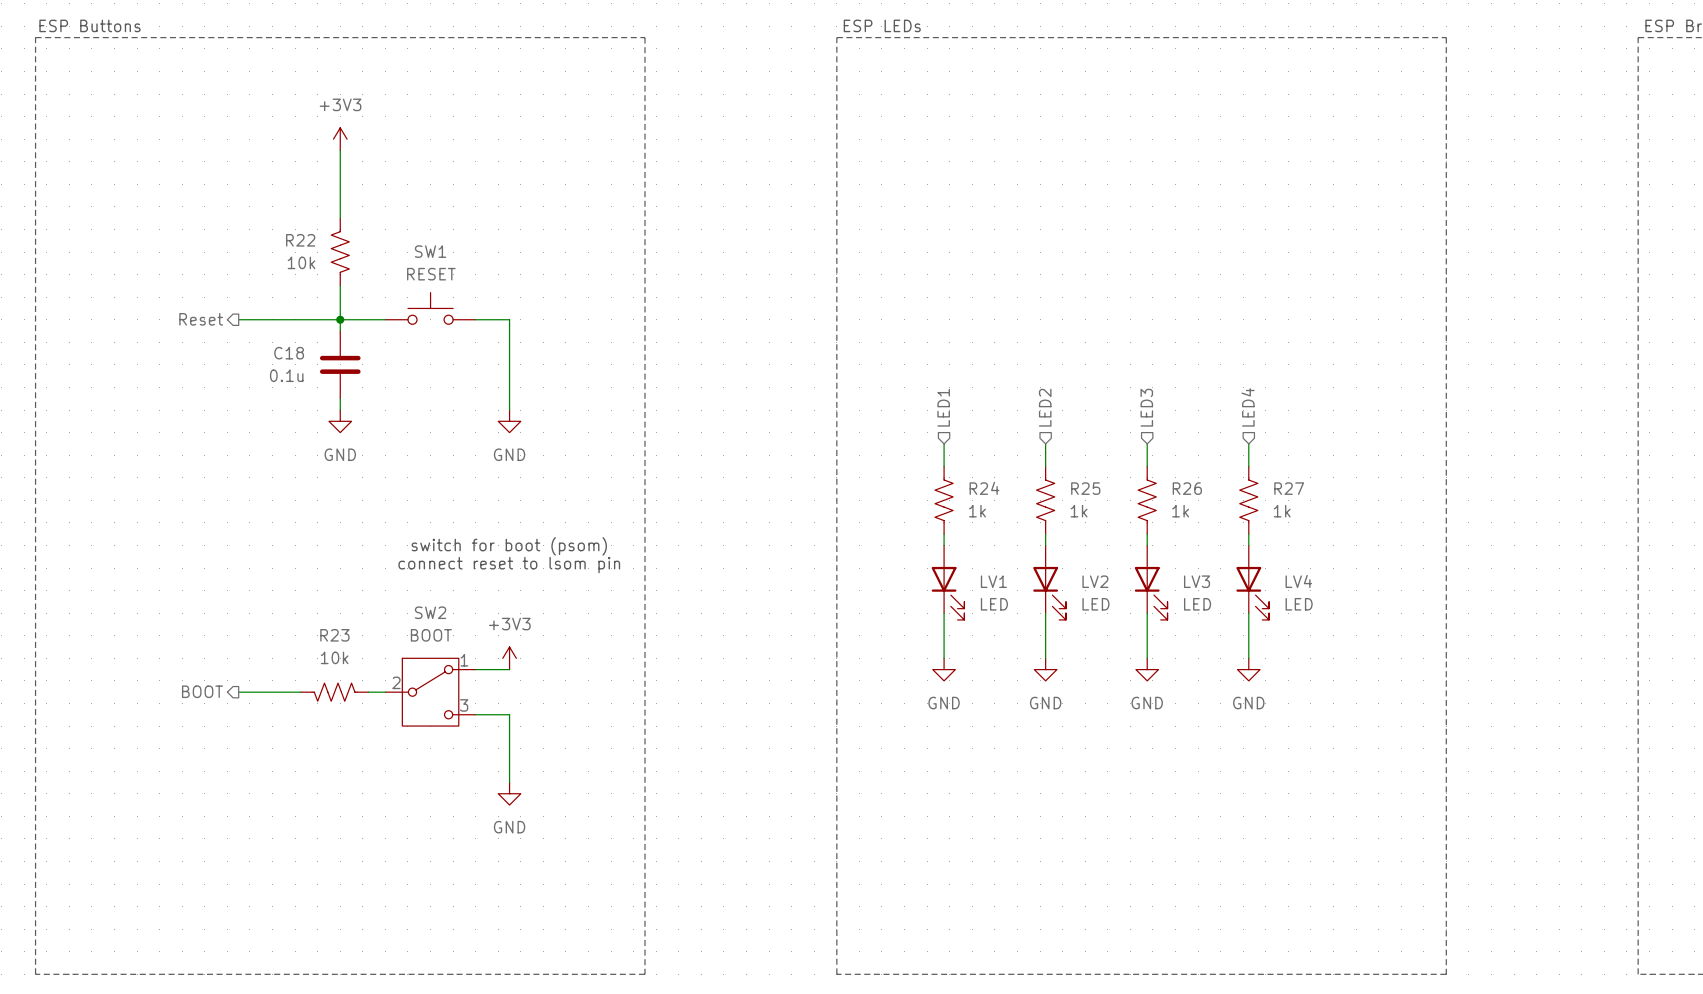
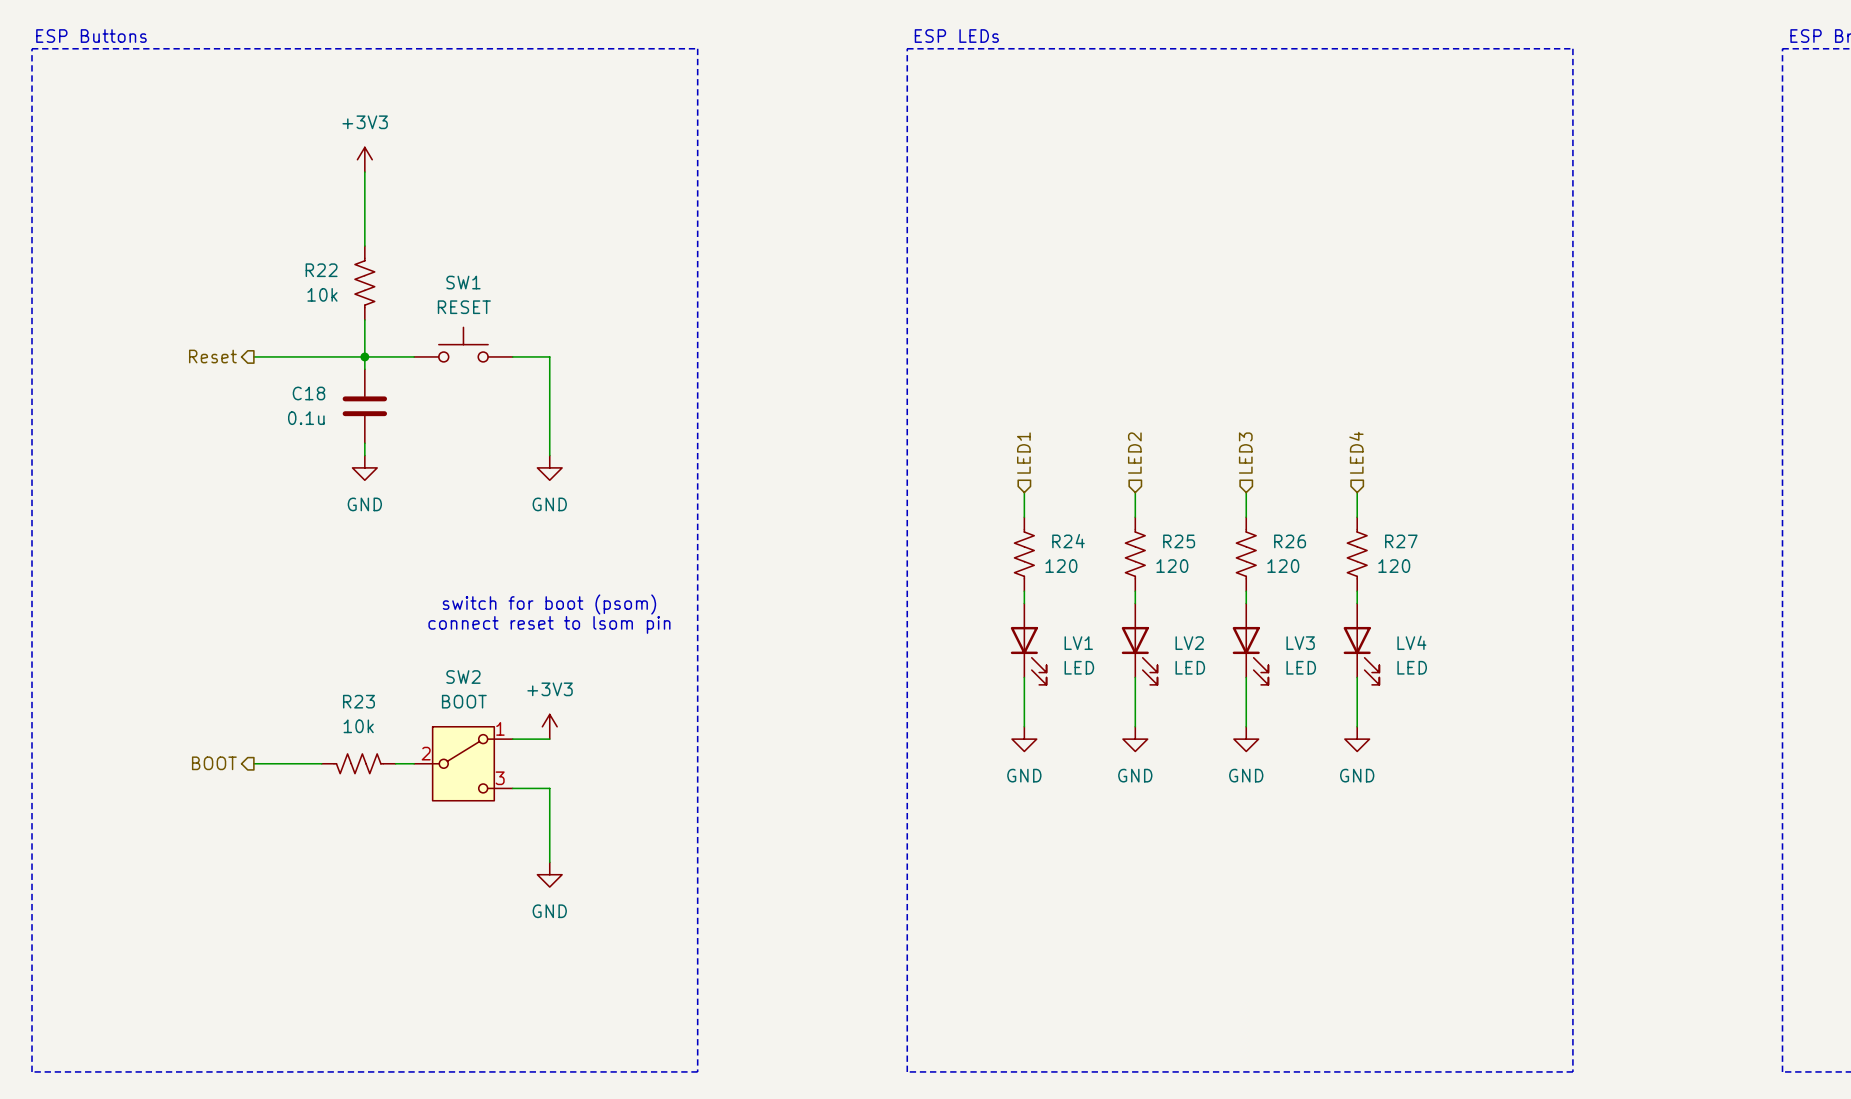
R24 value: 1k (977, 511) -> 120 (1061, 566)
R25 value: 1k (1079, 511) -> 120 (1172, 566)
R26 value: 1k (1180, 511) -> 120 (1283, 566)
R27 value: 1k (1282, 511) -> 120 (1394, 566)

